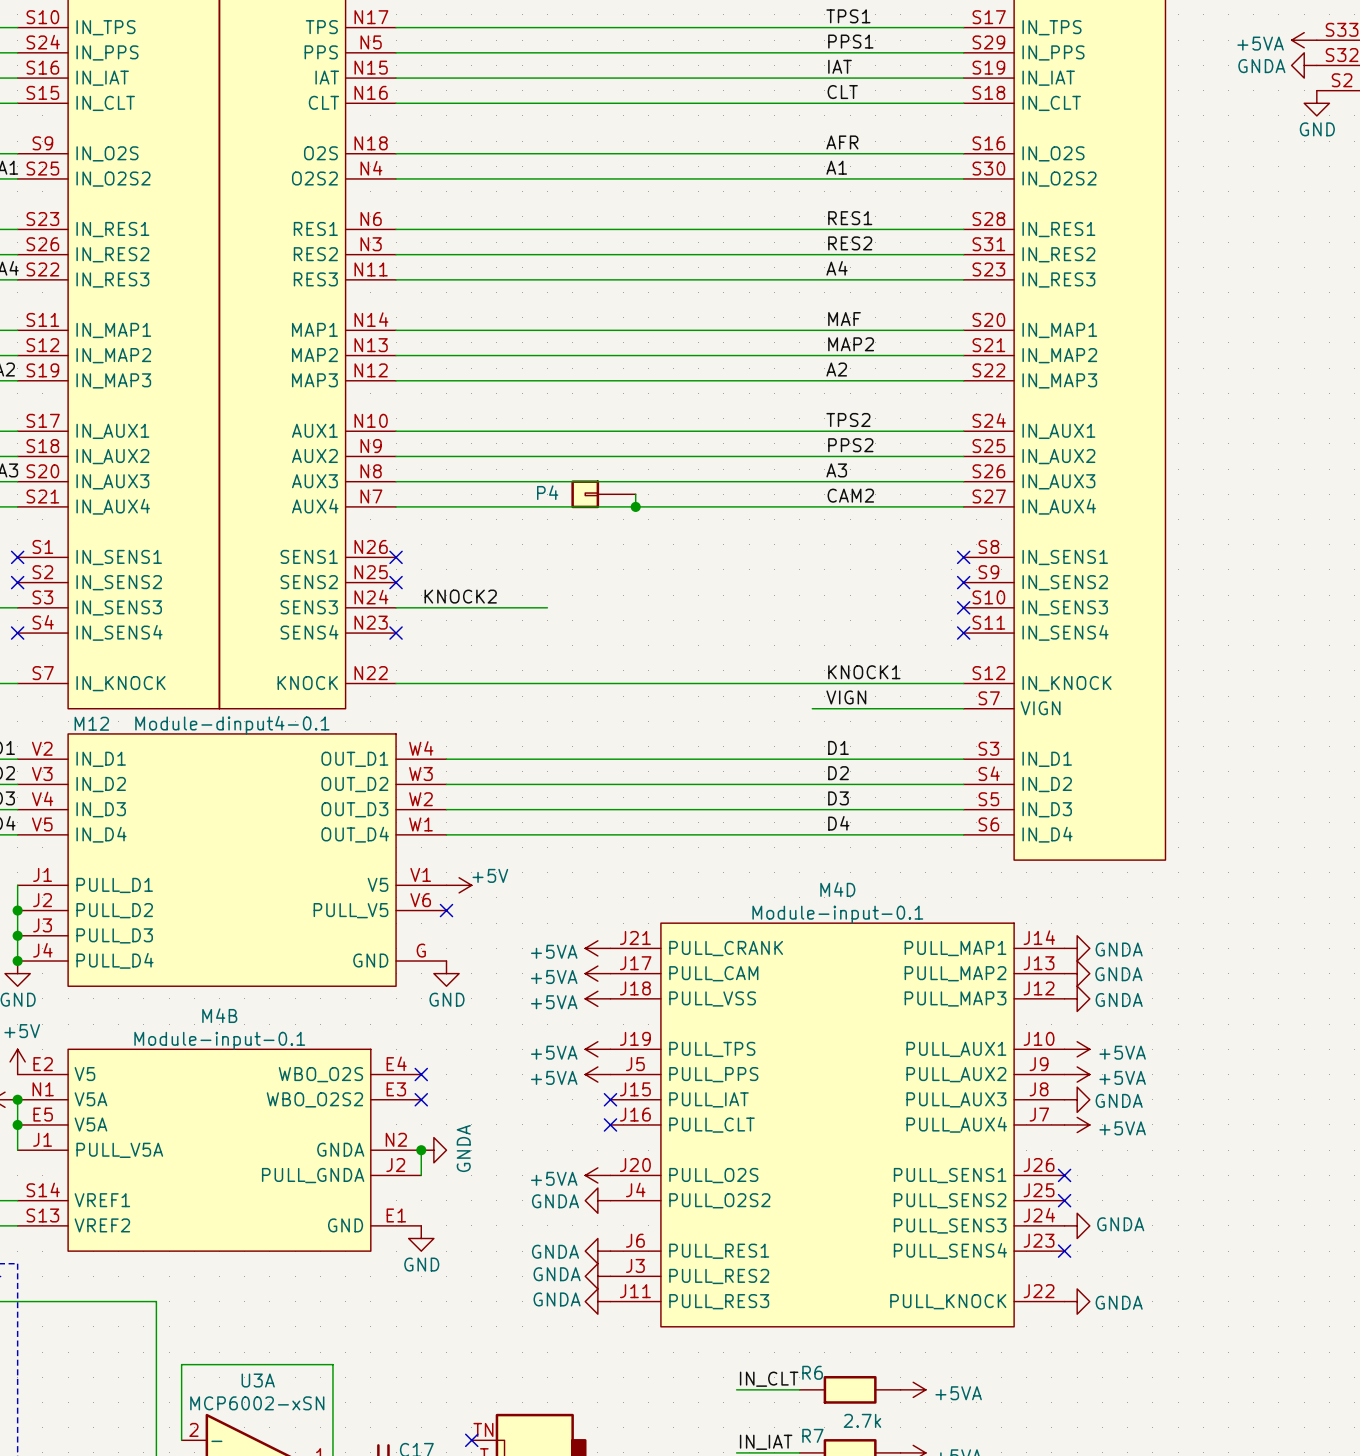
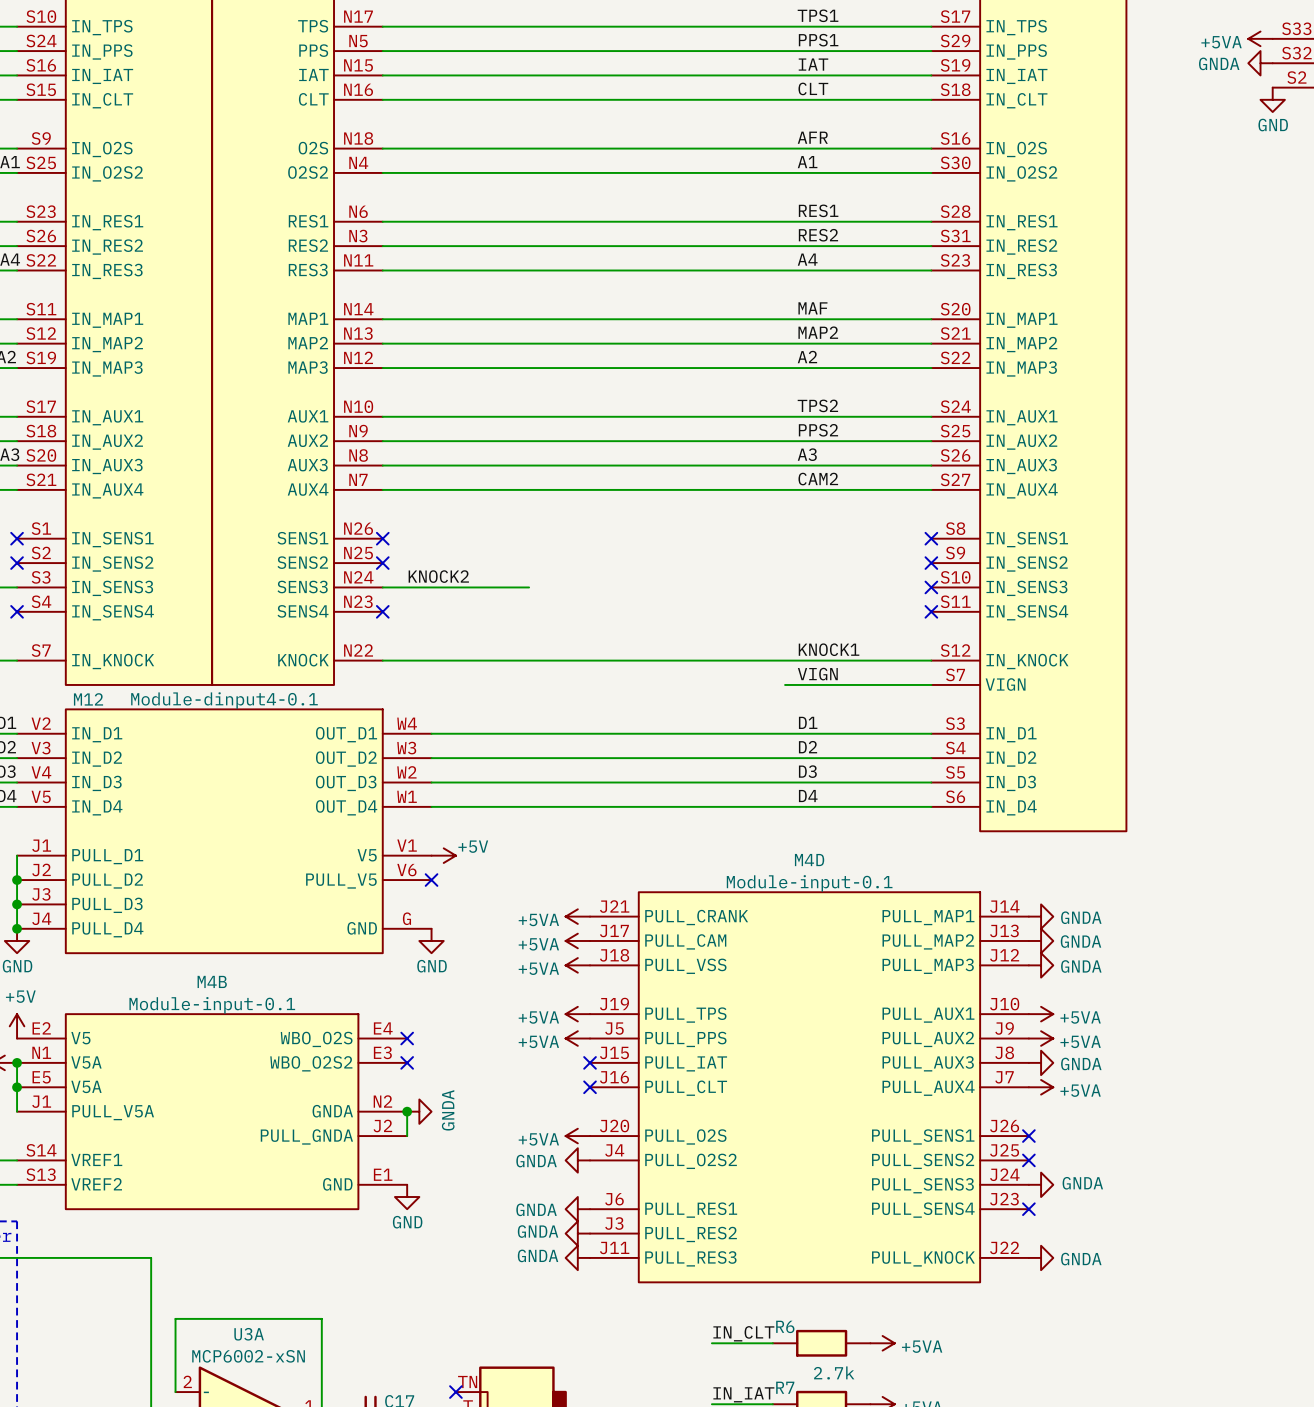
P4: (603, 494) -> none
wire: (635, 494) (635, 506) -> none
junction: (635, 506) -> none

